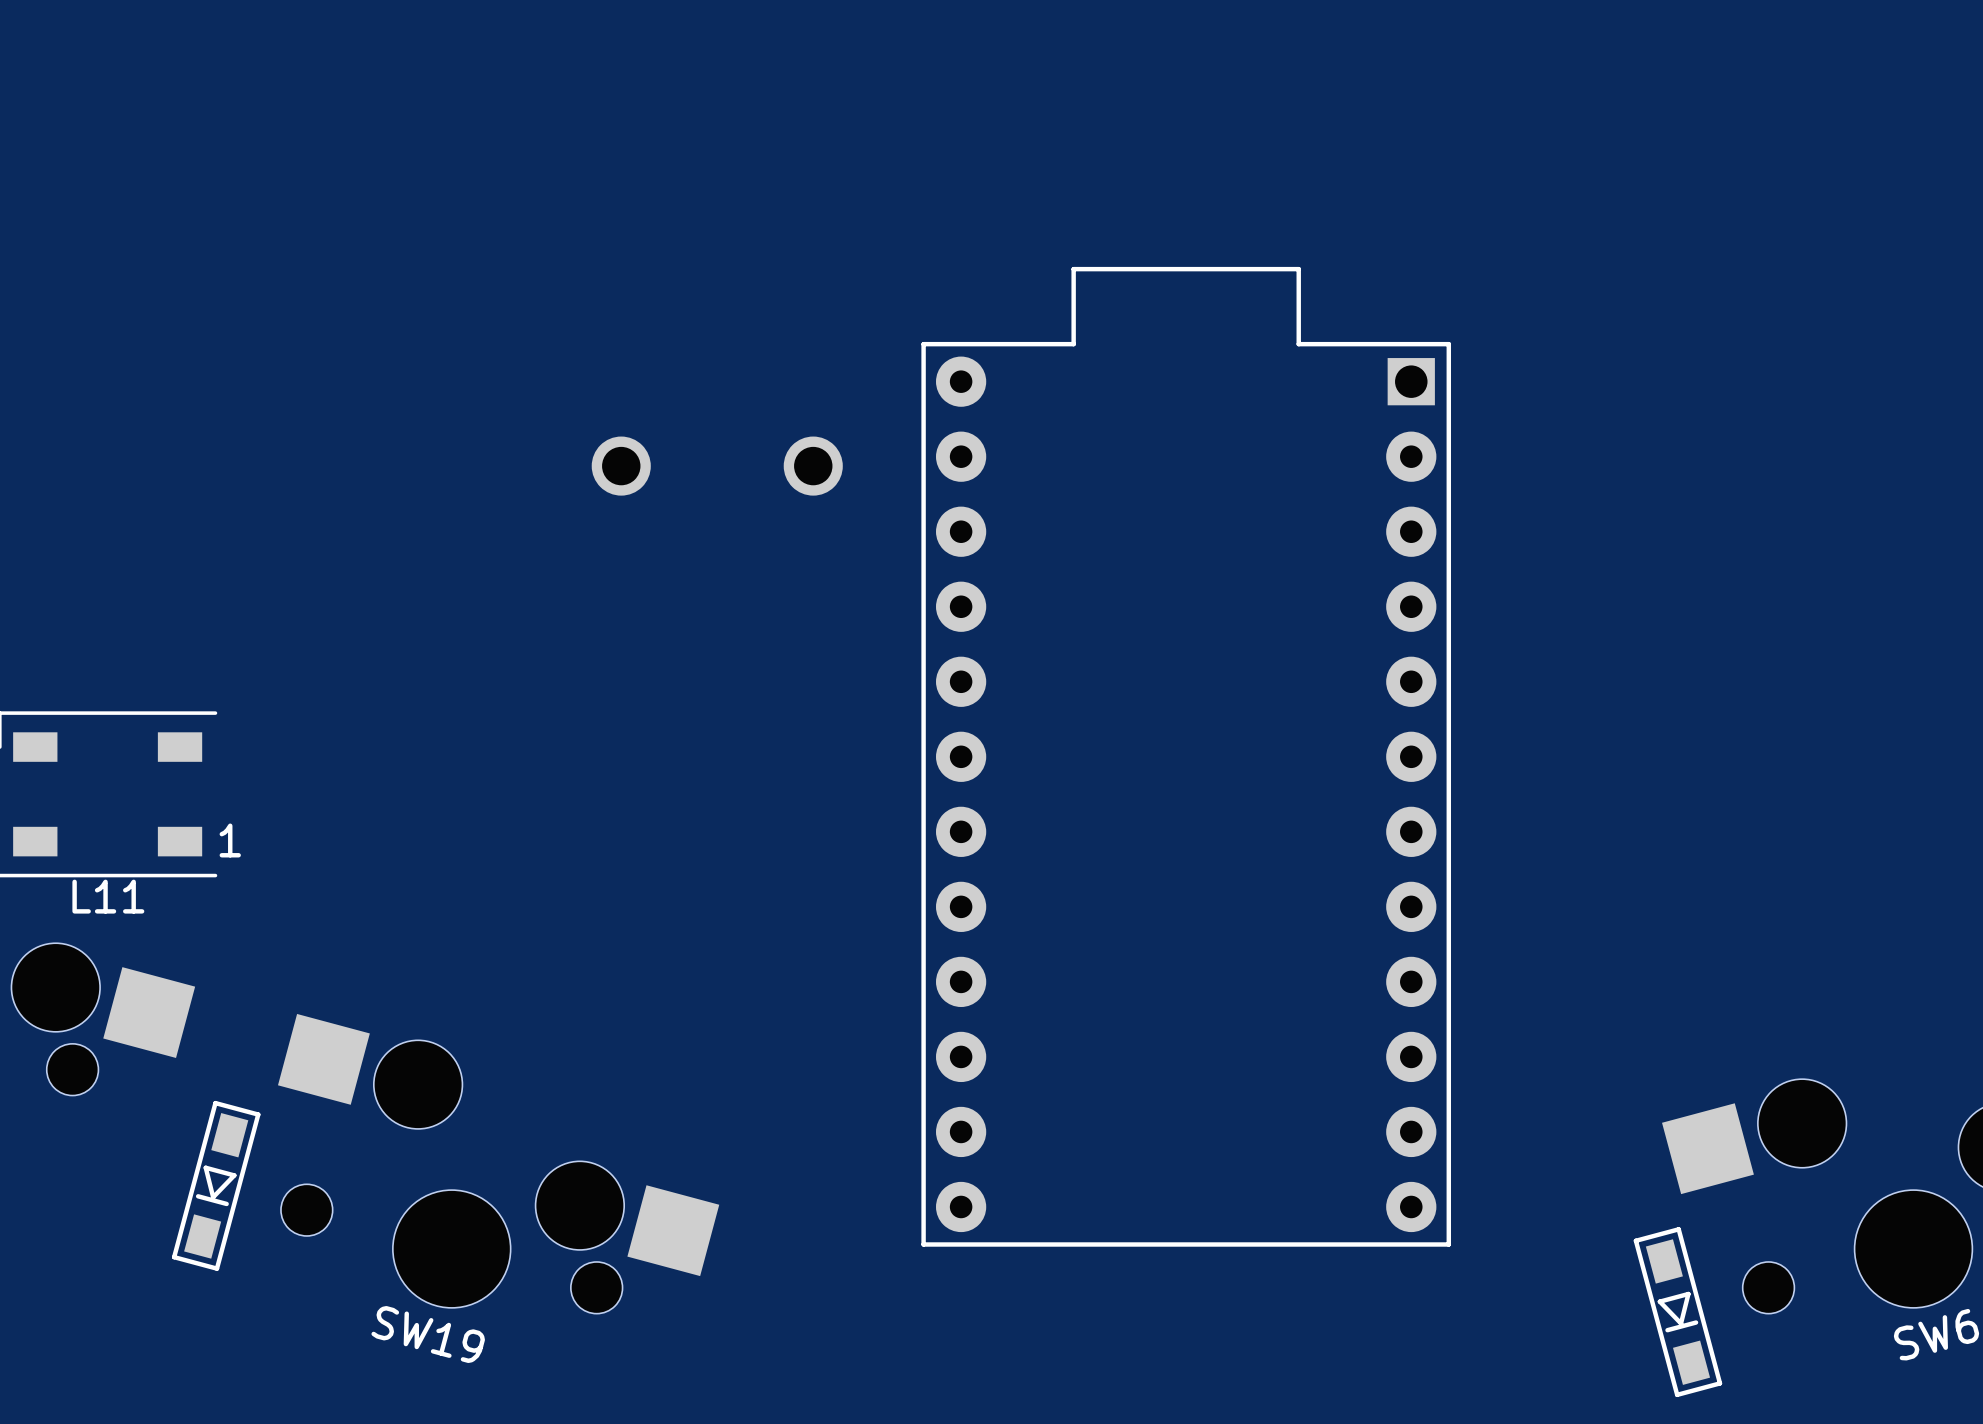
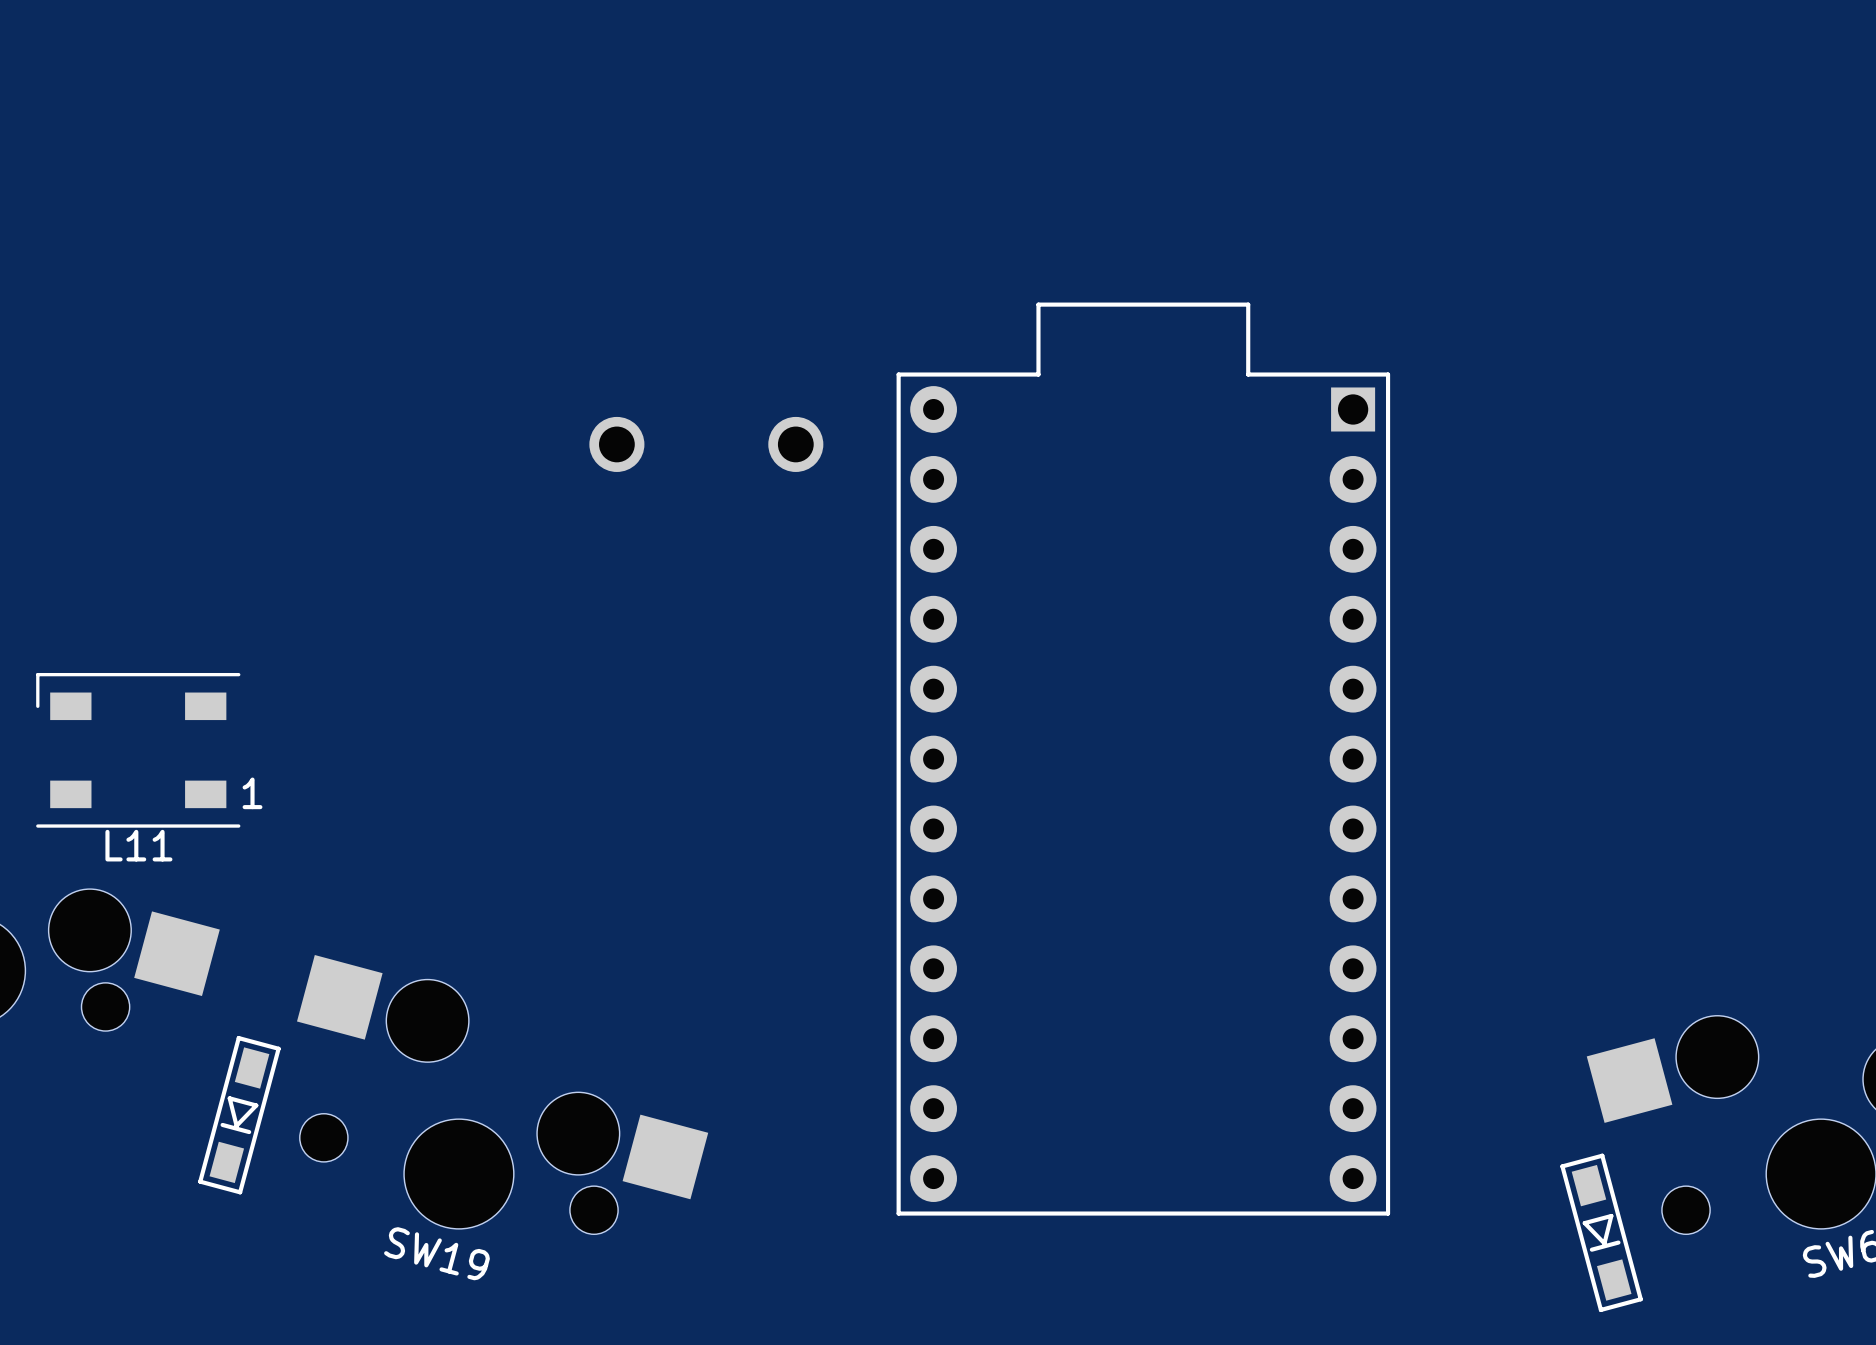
part position: (1186, 756) -> (1143, 759)

